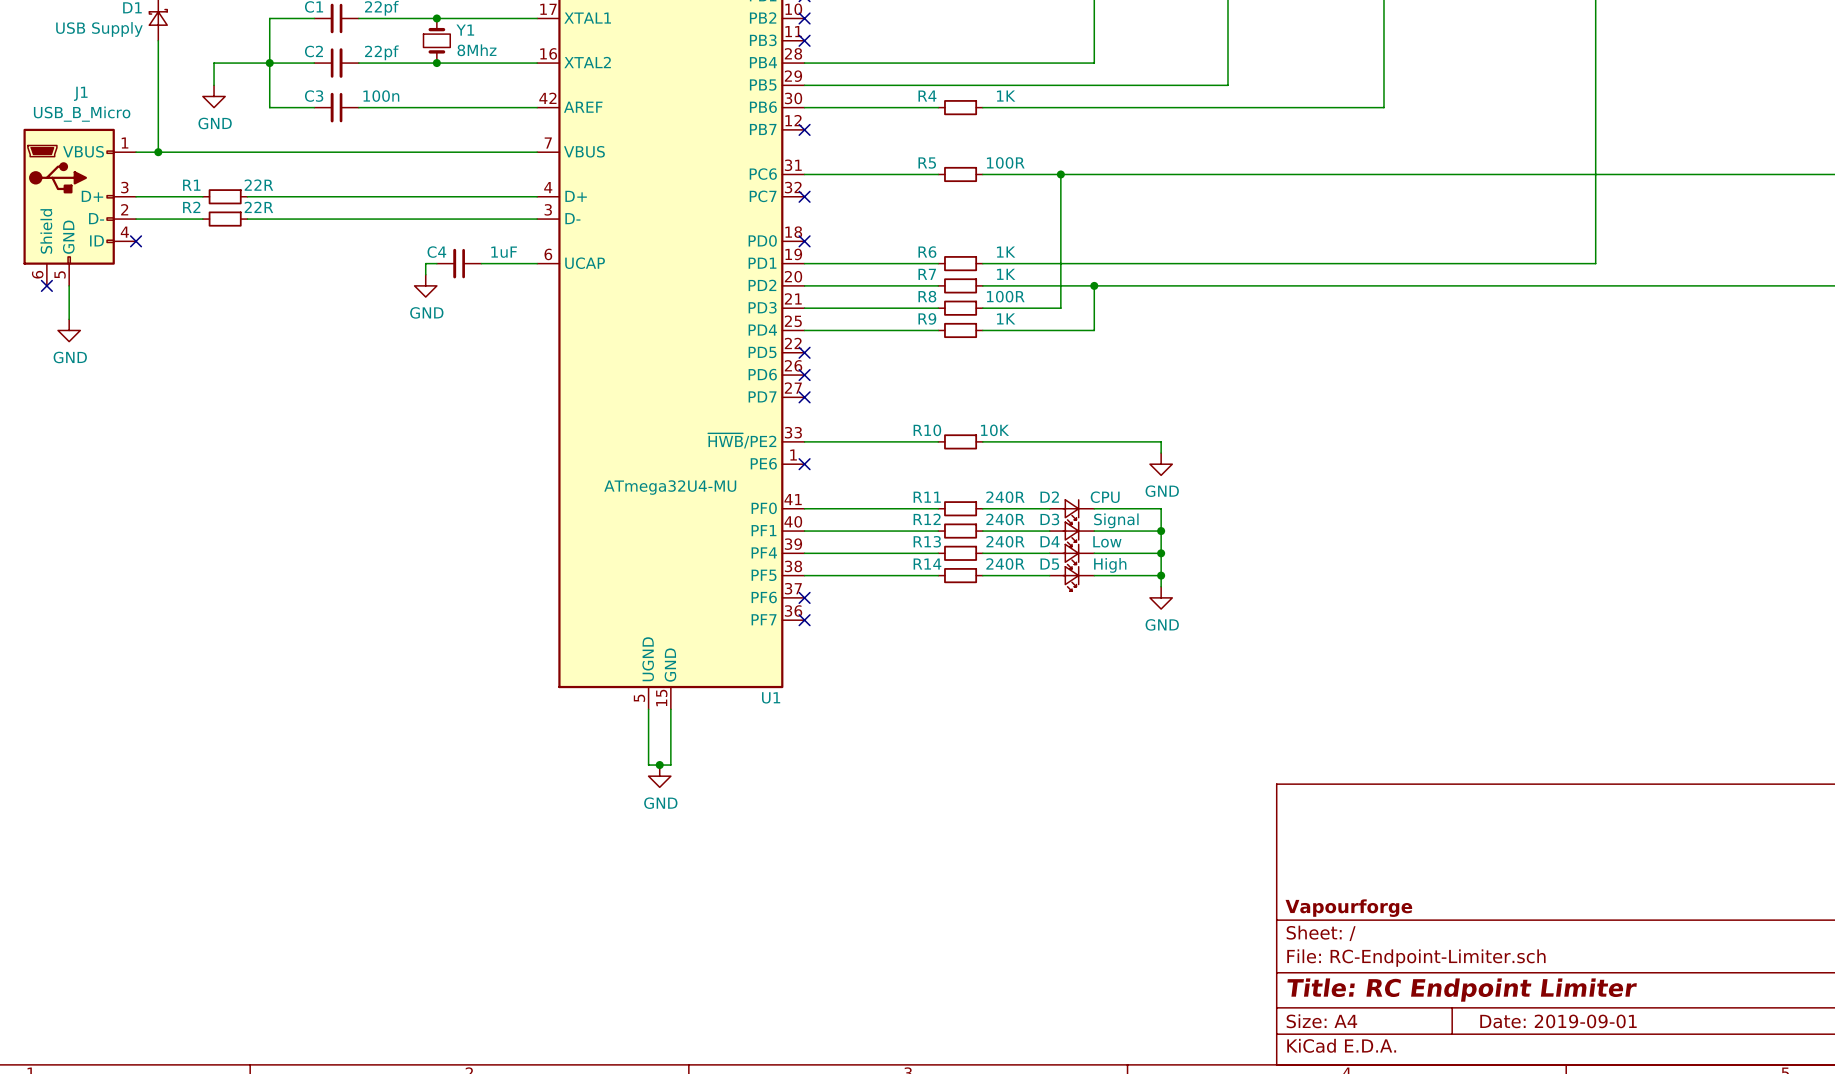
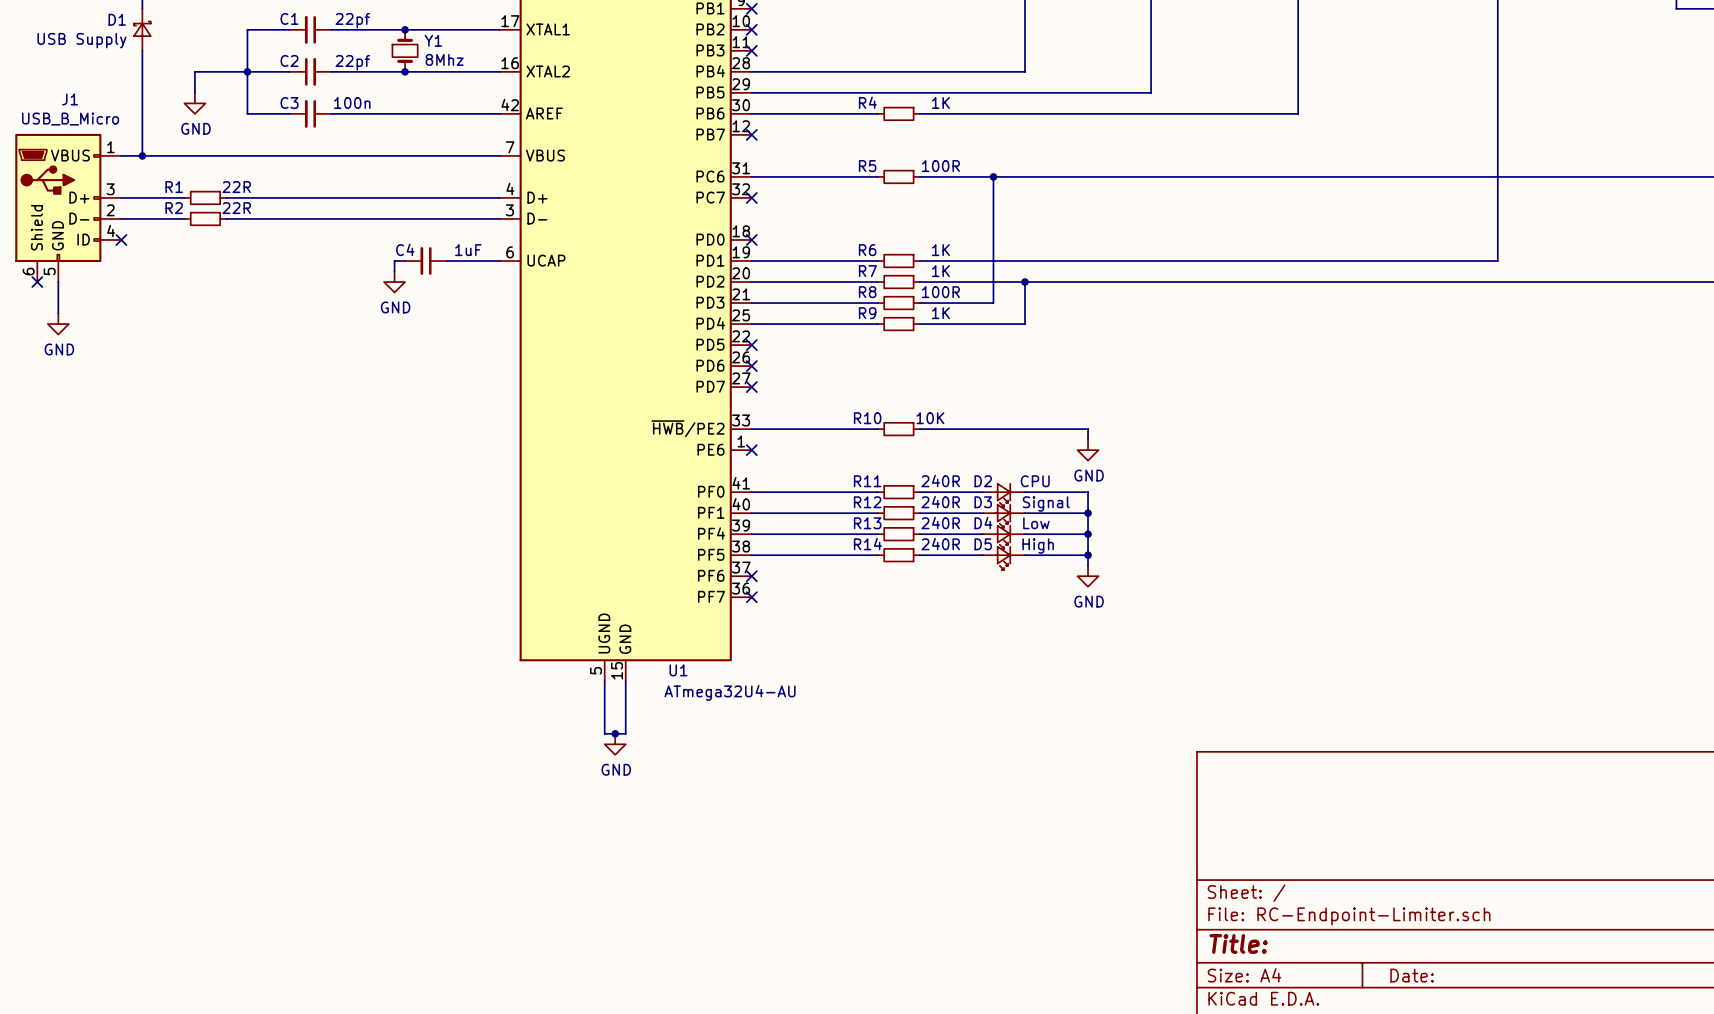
U1 value: ATmega32U4-MU (670, 487) -> ATmega32U4-AU (730, 692)
U1 name position: U1 (771, 697) -> U1 (678, 670)
title block: Vapourforge (1348, 908) -> none
title block: Title: RC Endpoint Limiter (1462, 990) -> Title: (1238, 943)
title block: Date: 2019-09-01 (1558, 1021) -> Date: (1412, 975)

